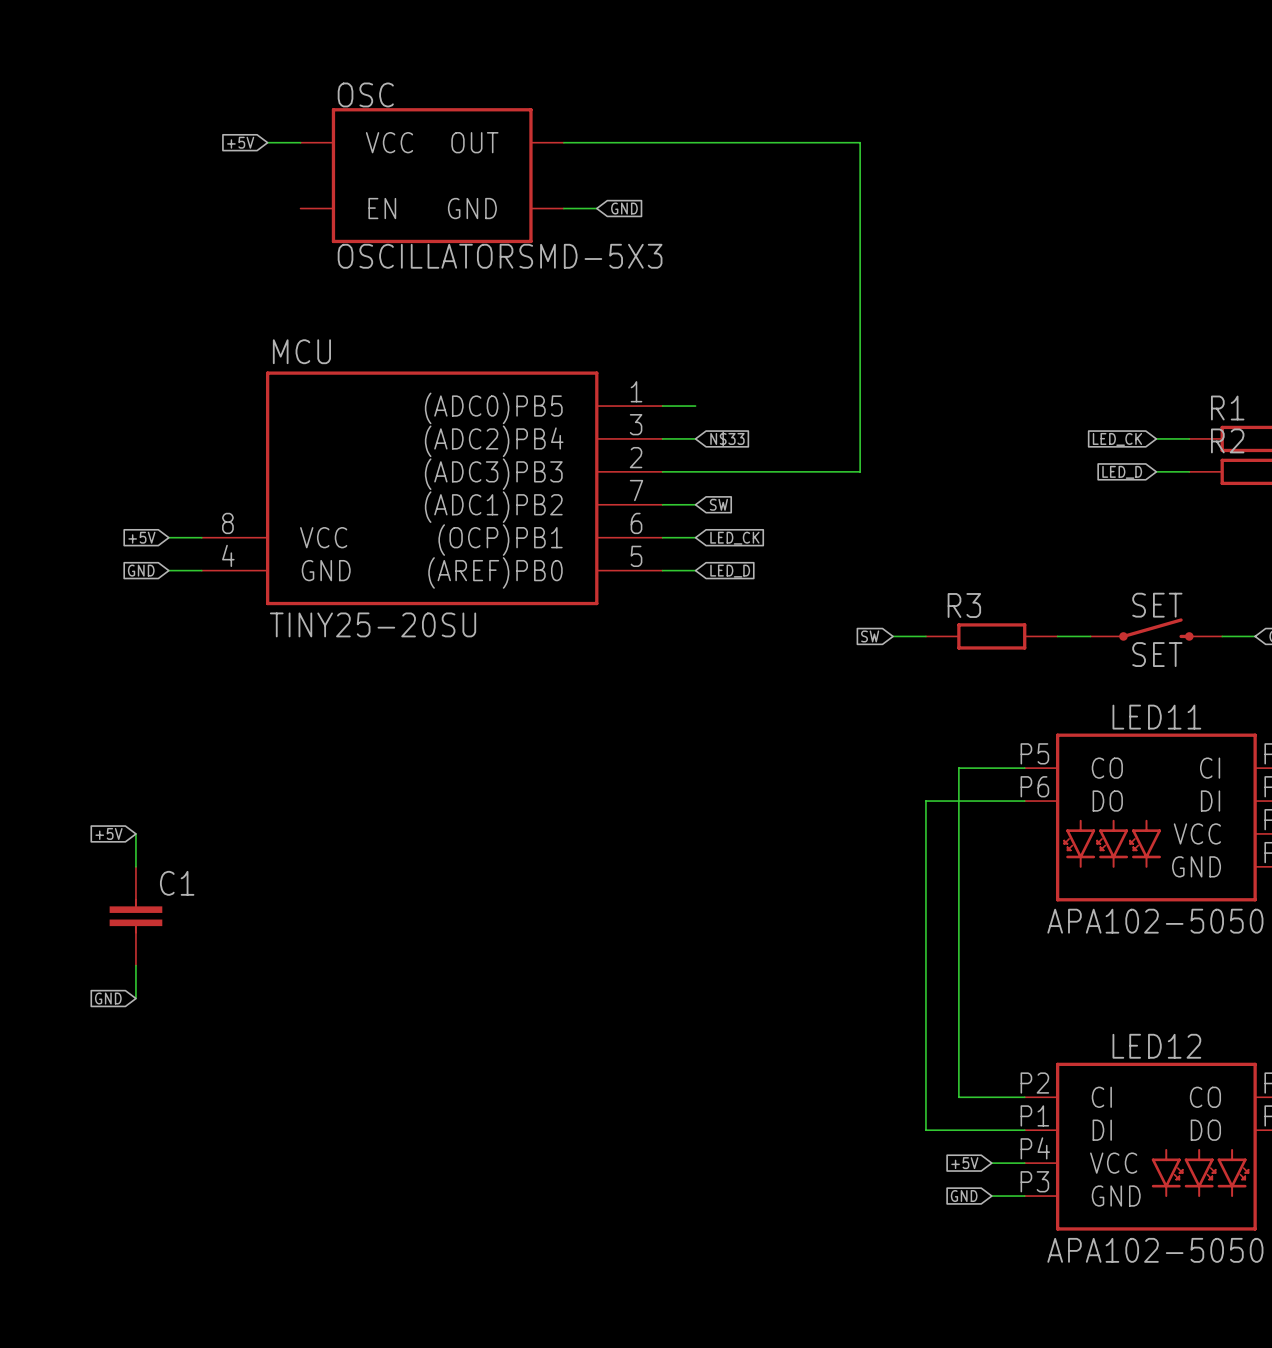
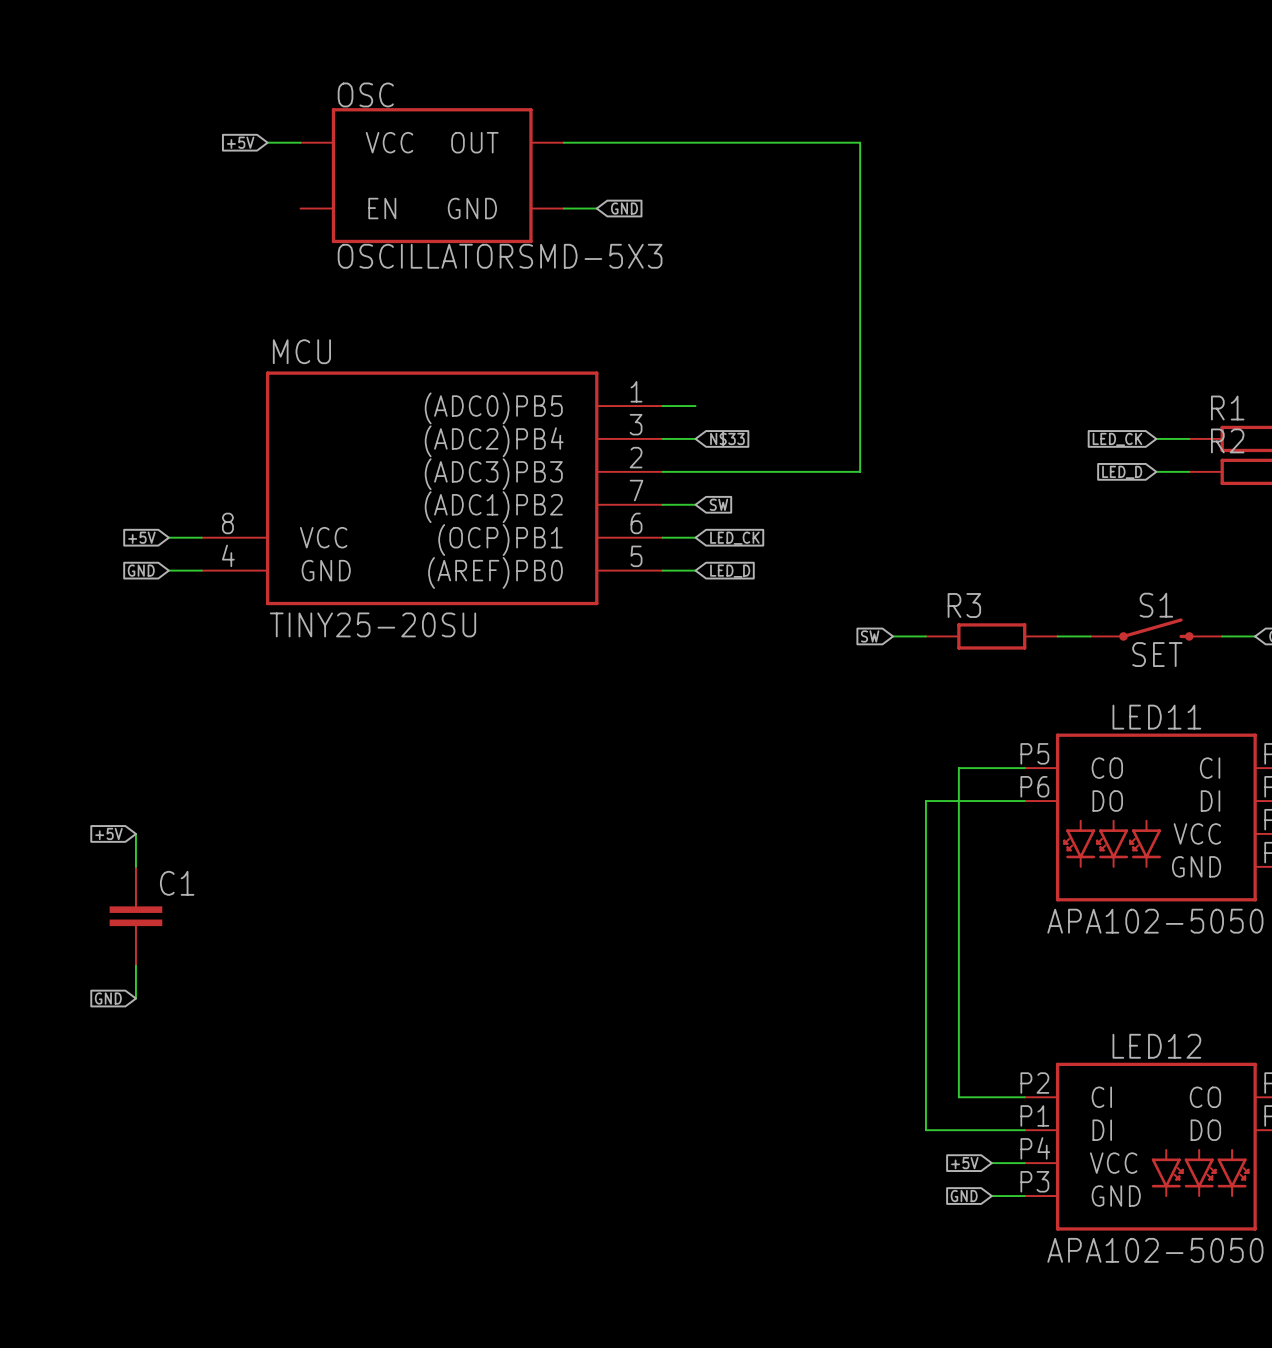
SET name: SET (1157, 605) -> S1 (1156, 605)

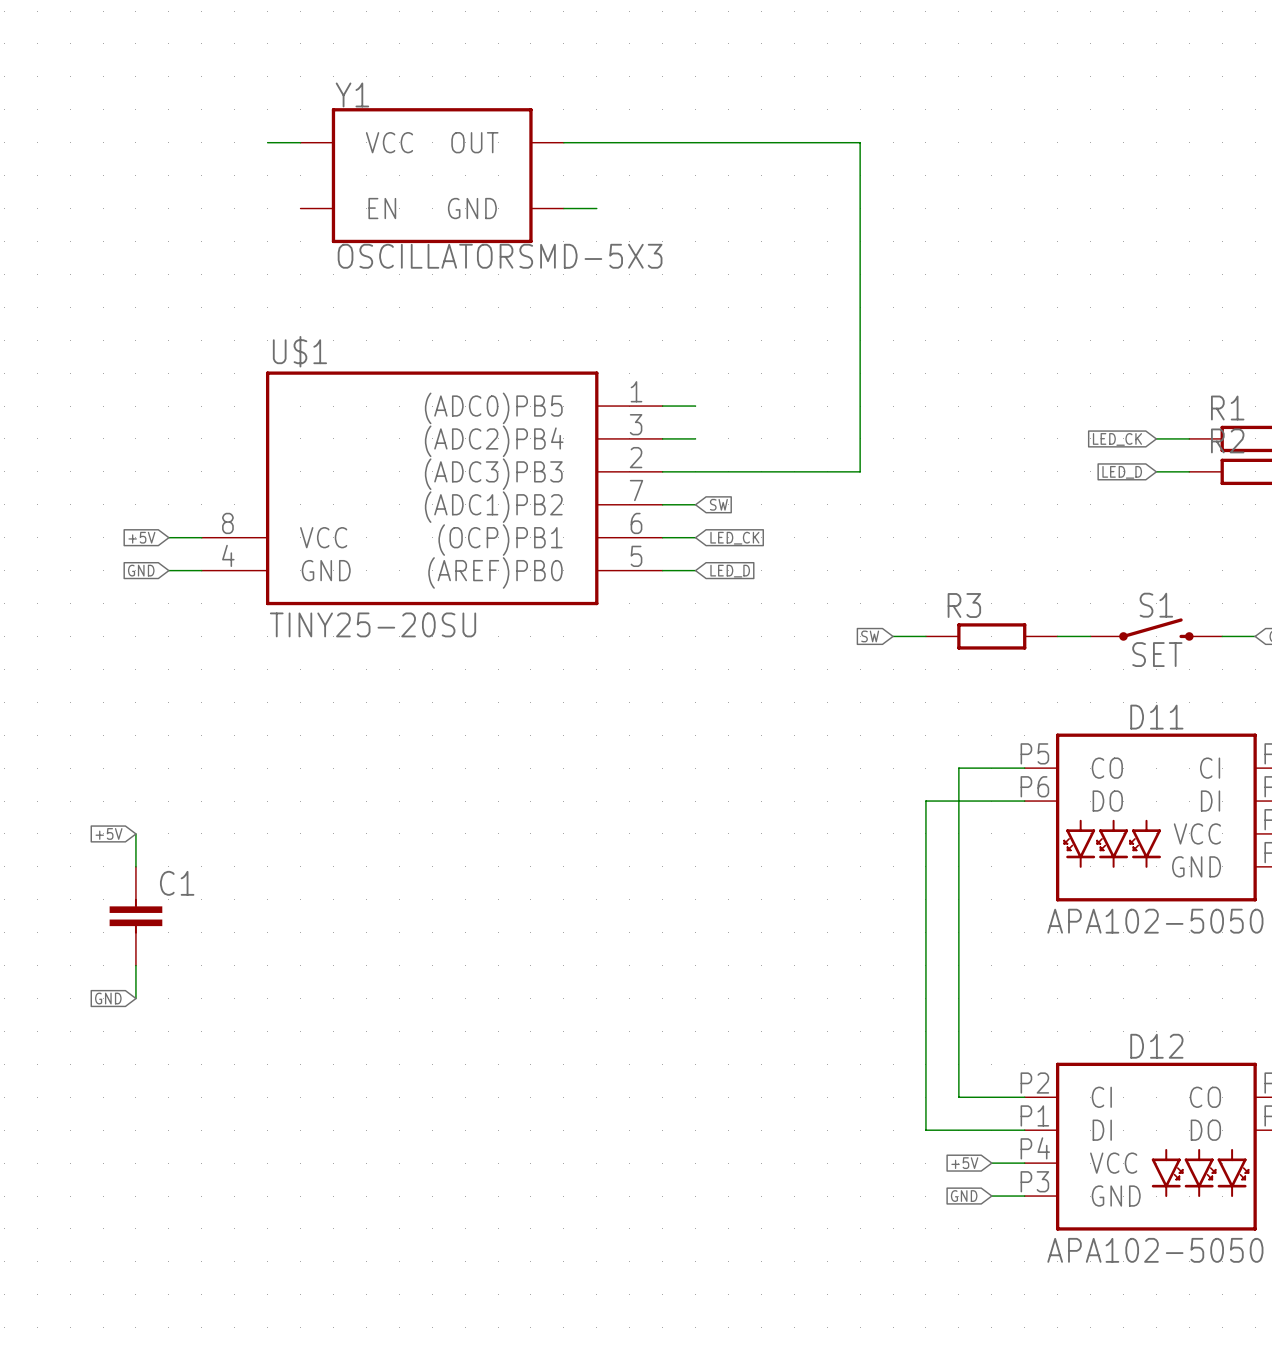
OSC name: OSC (365, 94) -> Y1 (352, 94)
global label: +5V (240, 142) -> none
global label: GND (624, 208) -> none
MCU name: MCU (301, 351) -> U$1 (299, 351)
global label: N$33 (727, 438) -> none
LED11 name: LED11 (1156, 717) -> D11 (1156, 717)
LED12 name: LED12 (1156, 1046) -> D12 (1156, 1046)

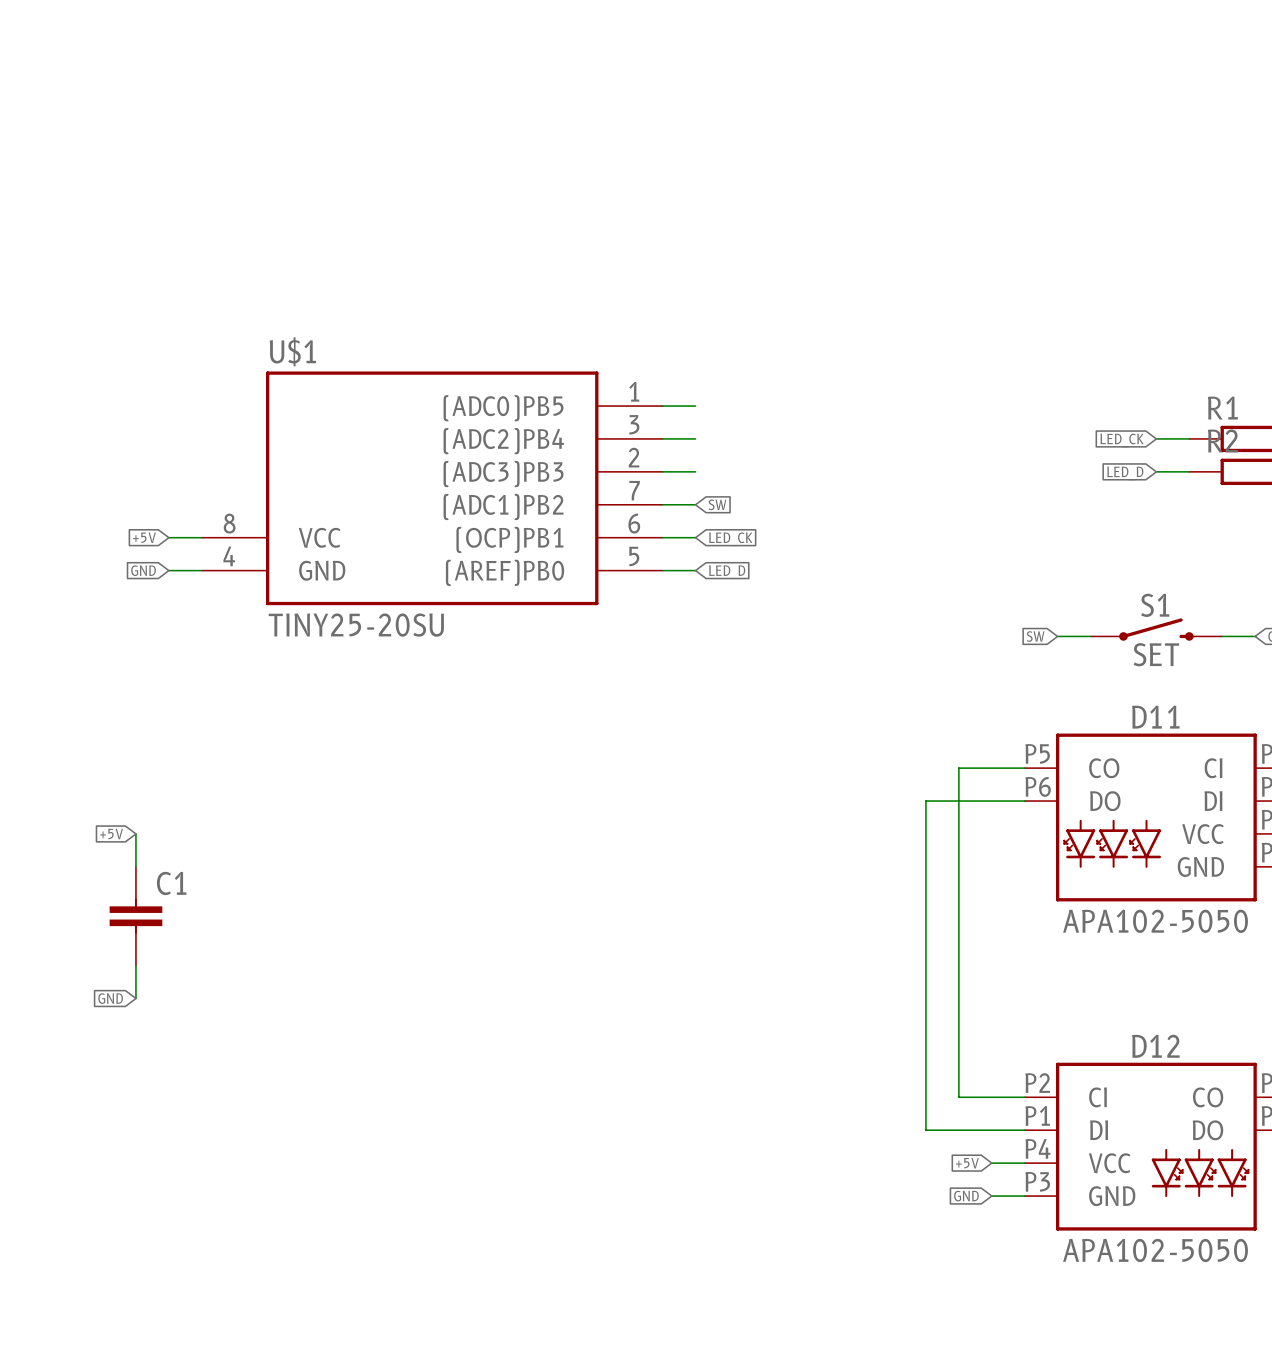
wire: (267, 142) (300, 142) -> none
wire: (563, 142) (860, 142) (860, 471) (695, 471) -> none
Y1: OSCILLATORSMD-5X3 (432, 175) -> none
wire: (563, 208) (596, 208) -> none
global label position: SW (870, 636) -> SW (1035, 636)
wire: (893, 636) (925, 636) -> none
R3: (991, 636) -> none

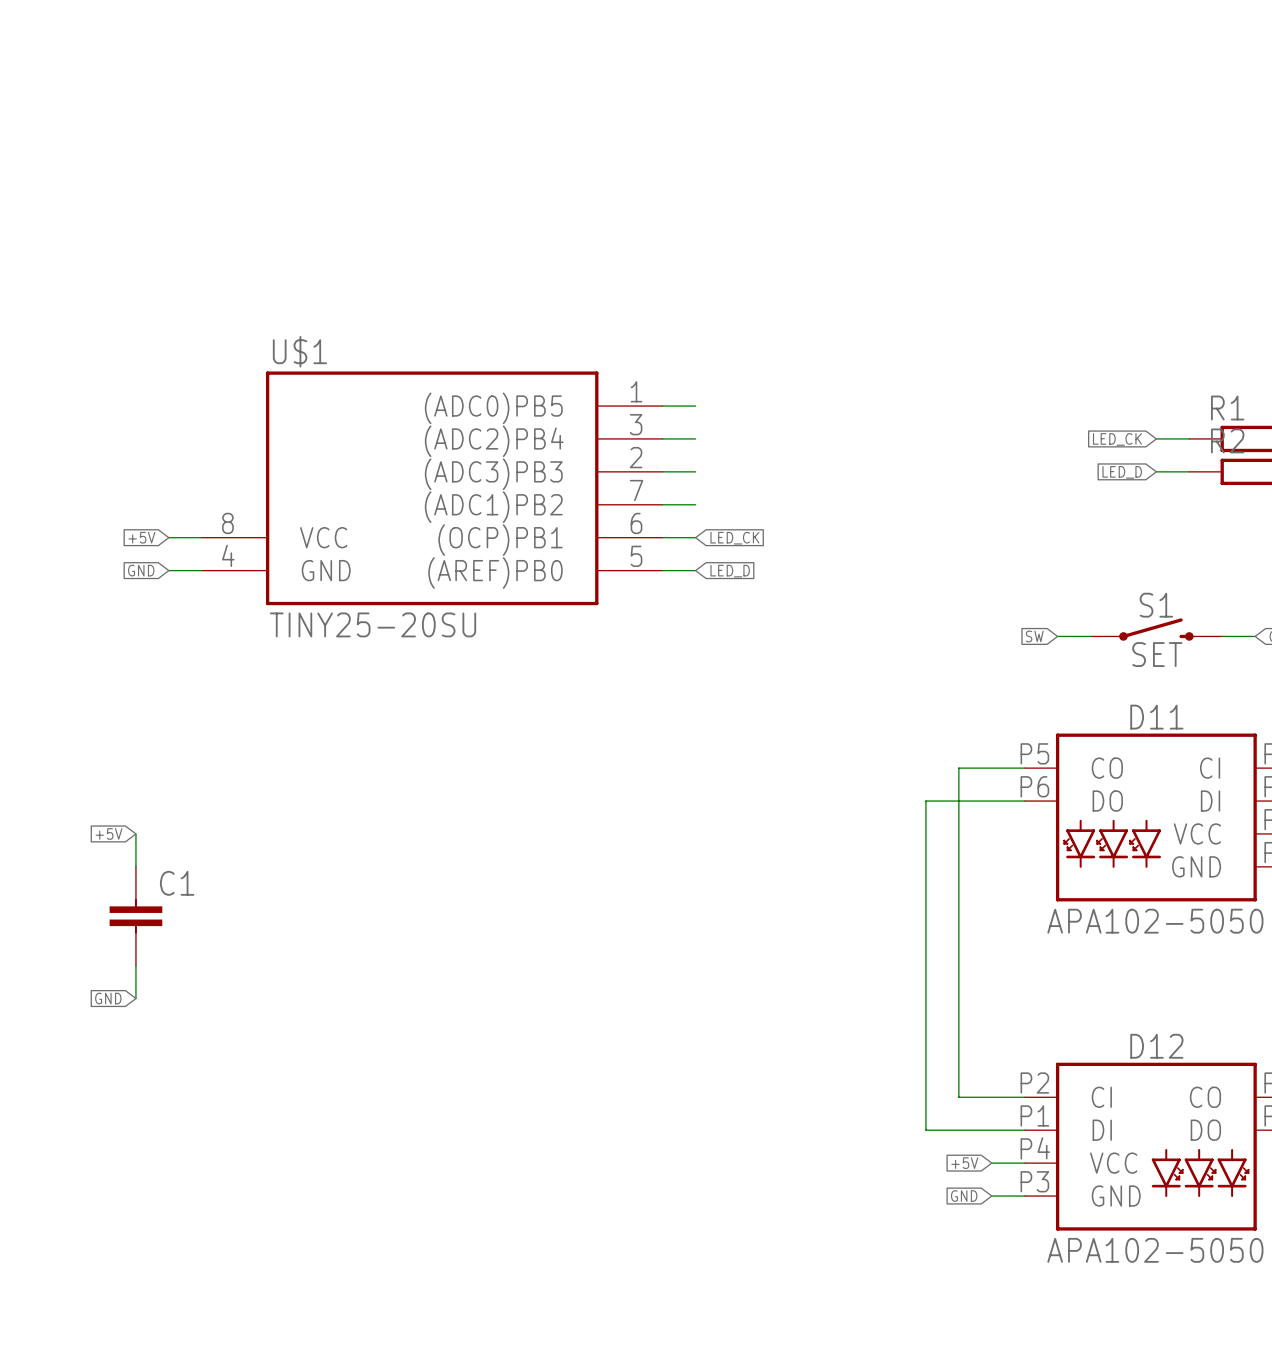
global label: SW (717, 504) -> none

